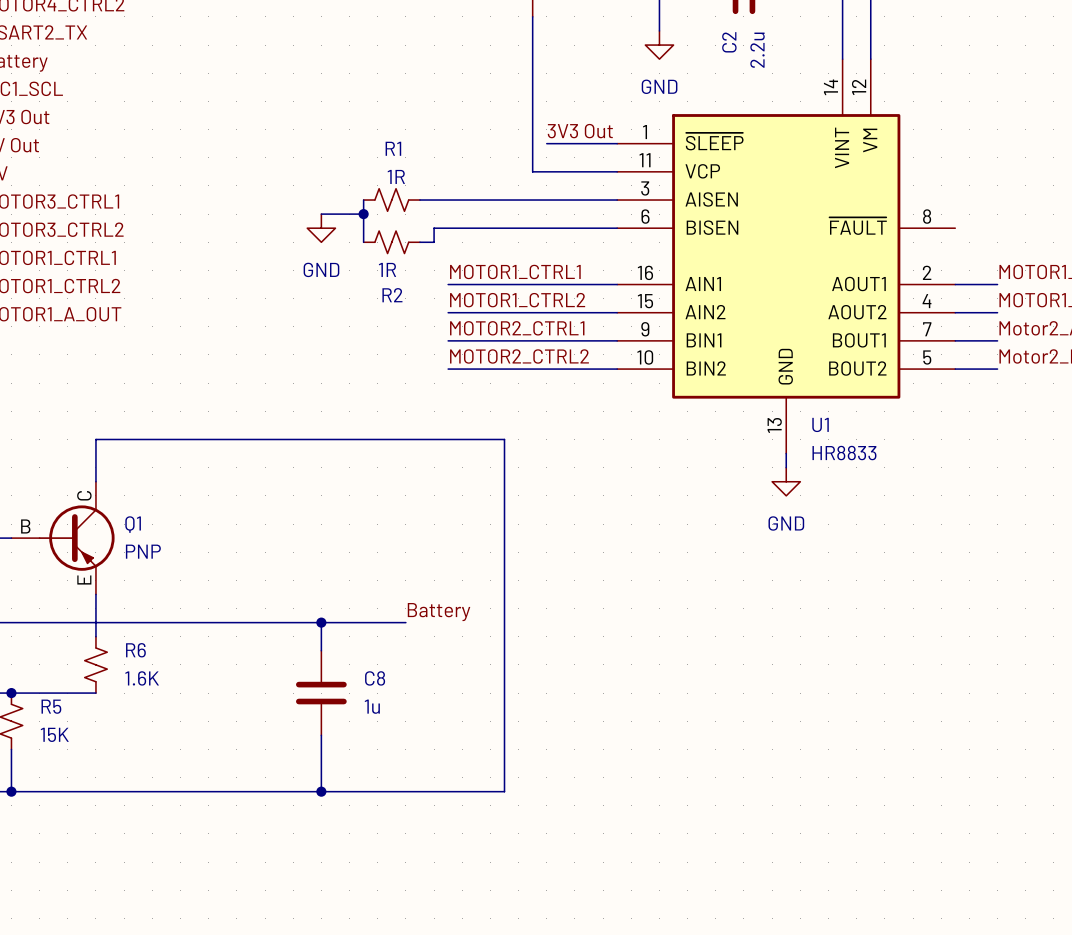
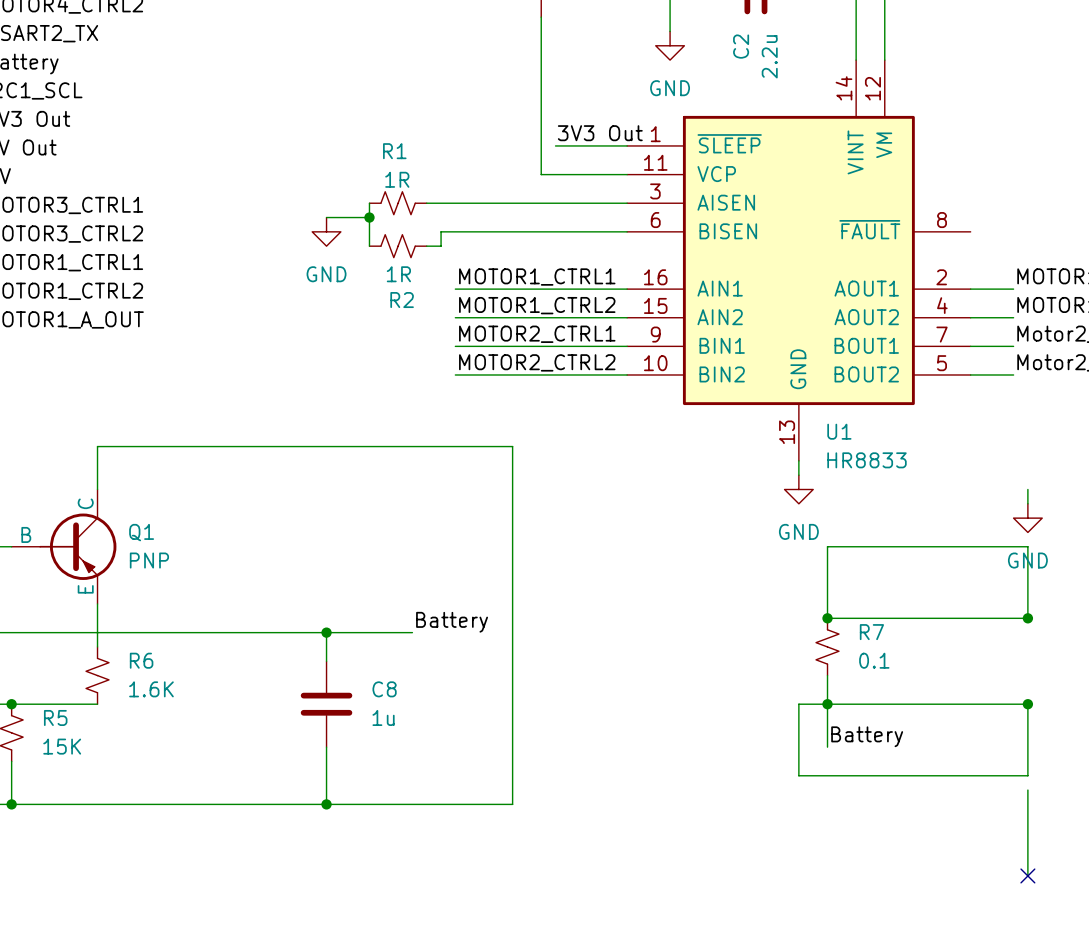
wire: none -> (1027, 489) (1027, 503)
power symbol: none -> GND (1027, 518)
wire: none -> (827, 546) (827, 618) (1027, 618) (1027, 546) (827, 546)
junction: none -> (827, 618)
junction: none -> (1027, 618)
R7: none -> 0.1 (827, 646)
wire: none -> (827, 675) (827, 747)
wire: none -> (798, 704) (798, 775) (1027, 775) (1027, 704) (798, 704)
junction: none -> (827, 704)
junction: none -> (1027, 704)
label: none -> Battery (867, 736)
wire: none -> (1027, 790) (1027, 875)
no-connect mark: none -> (1027, 875)

